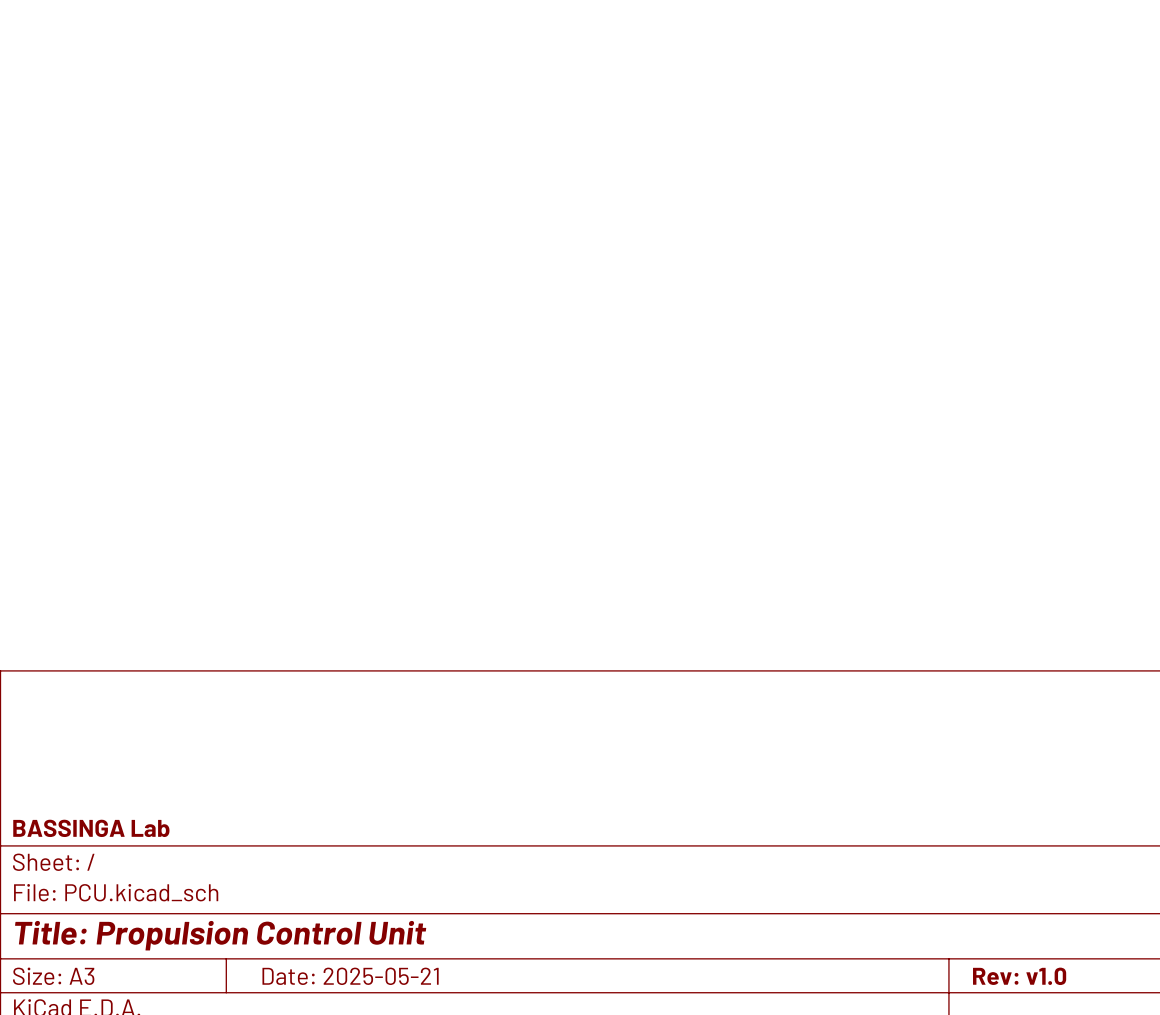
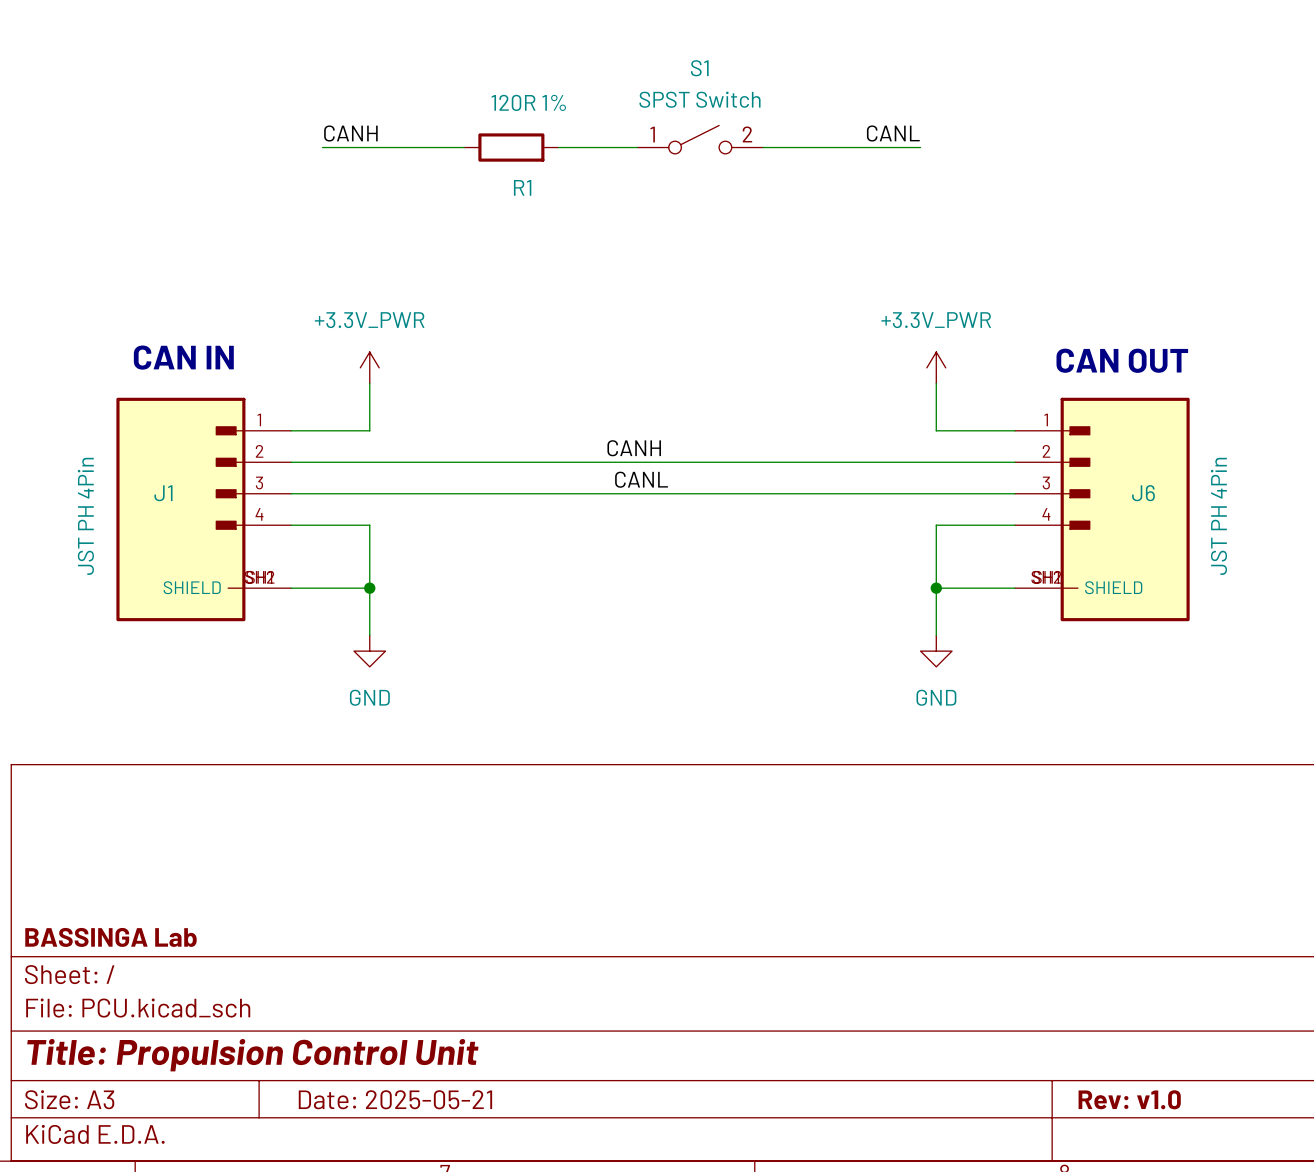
label: none -> CANH (350, 133)
label: none -> CANL (893, 133)
S1: none -> SPST Switch (700, 139)
wire: none -> (322, 147) (464, 147)
R1: none -> 120R 1% (511, 147)
wire: none -> (558, 147) (637, 147)
wire: none -> (763, 147) (920, 147)
text: none -> CAN IN (183, 357)
text: none -> CAN OUT (1122, 360)
power symbol: none -> +3.3V_PWR (369, 367)
power symbol: none -> +3.3V_PWR (936, 367)
wire: none -> (369, 383) (369, 430) (291, 430)
wire: none -> (936, 383) (936, 430) (1014, 430)
label: none -> CANH (634, 448)
wire: none -> (291, 462) (1014, 462)
label: none -> CANL (641, 479)
wire: none -> (291, 493) (1014, 493)
J1: none -> JST PH 4Pin (203, 509)
J6: none -> JST PH 4Pin (1102, 509)
wire: none -> (291, 525) (369, 525) (369, 635)
wire: none -> (1014, 525) (936, 525) (936, 635)
wire: none -> (291, 588) (369, 588)
junction: none -> (369, 588)
wire: none -> (936, 588) (1014, 588)
junction: none -> (936, 588)
power symbol: none -> GND (369, 651)
power symbol: none -> GND (936, 651)

